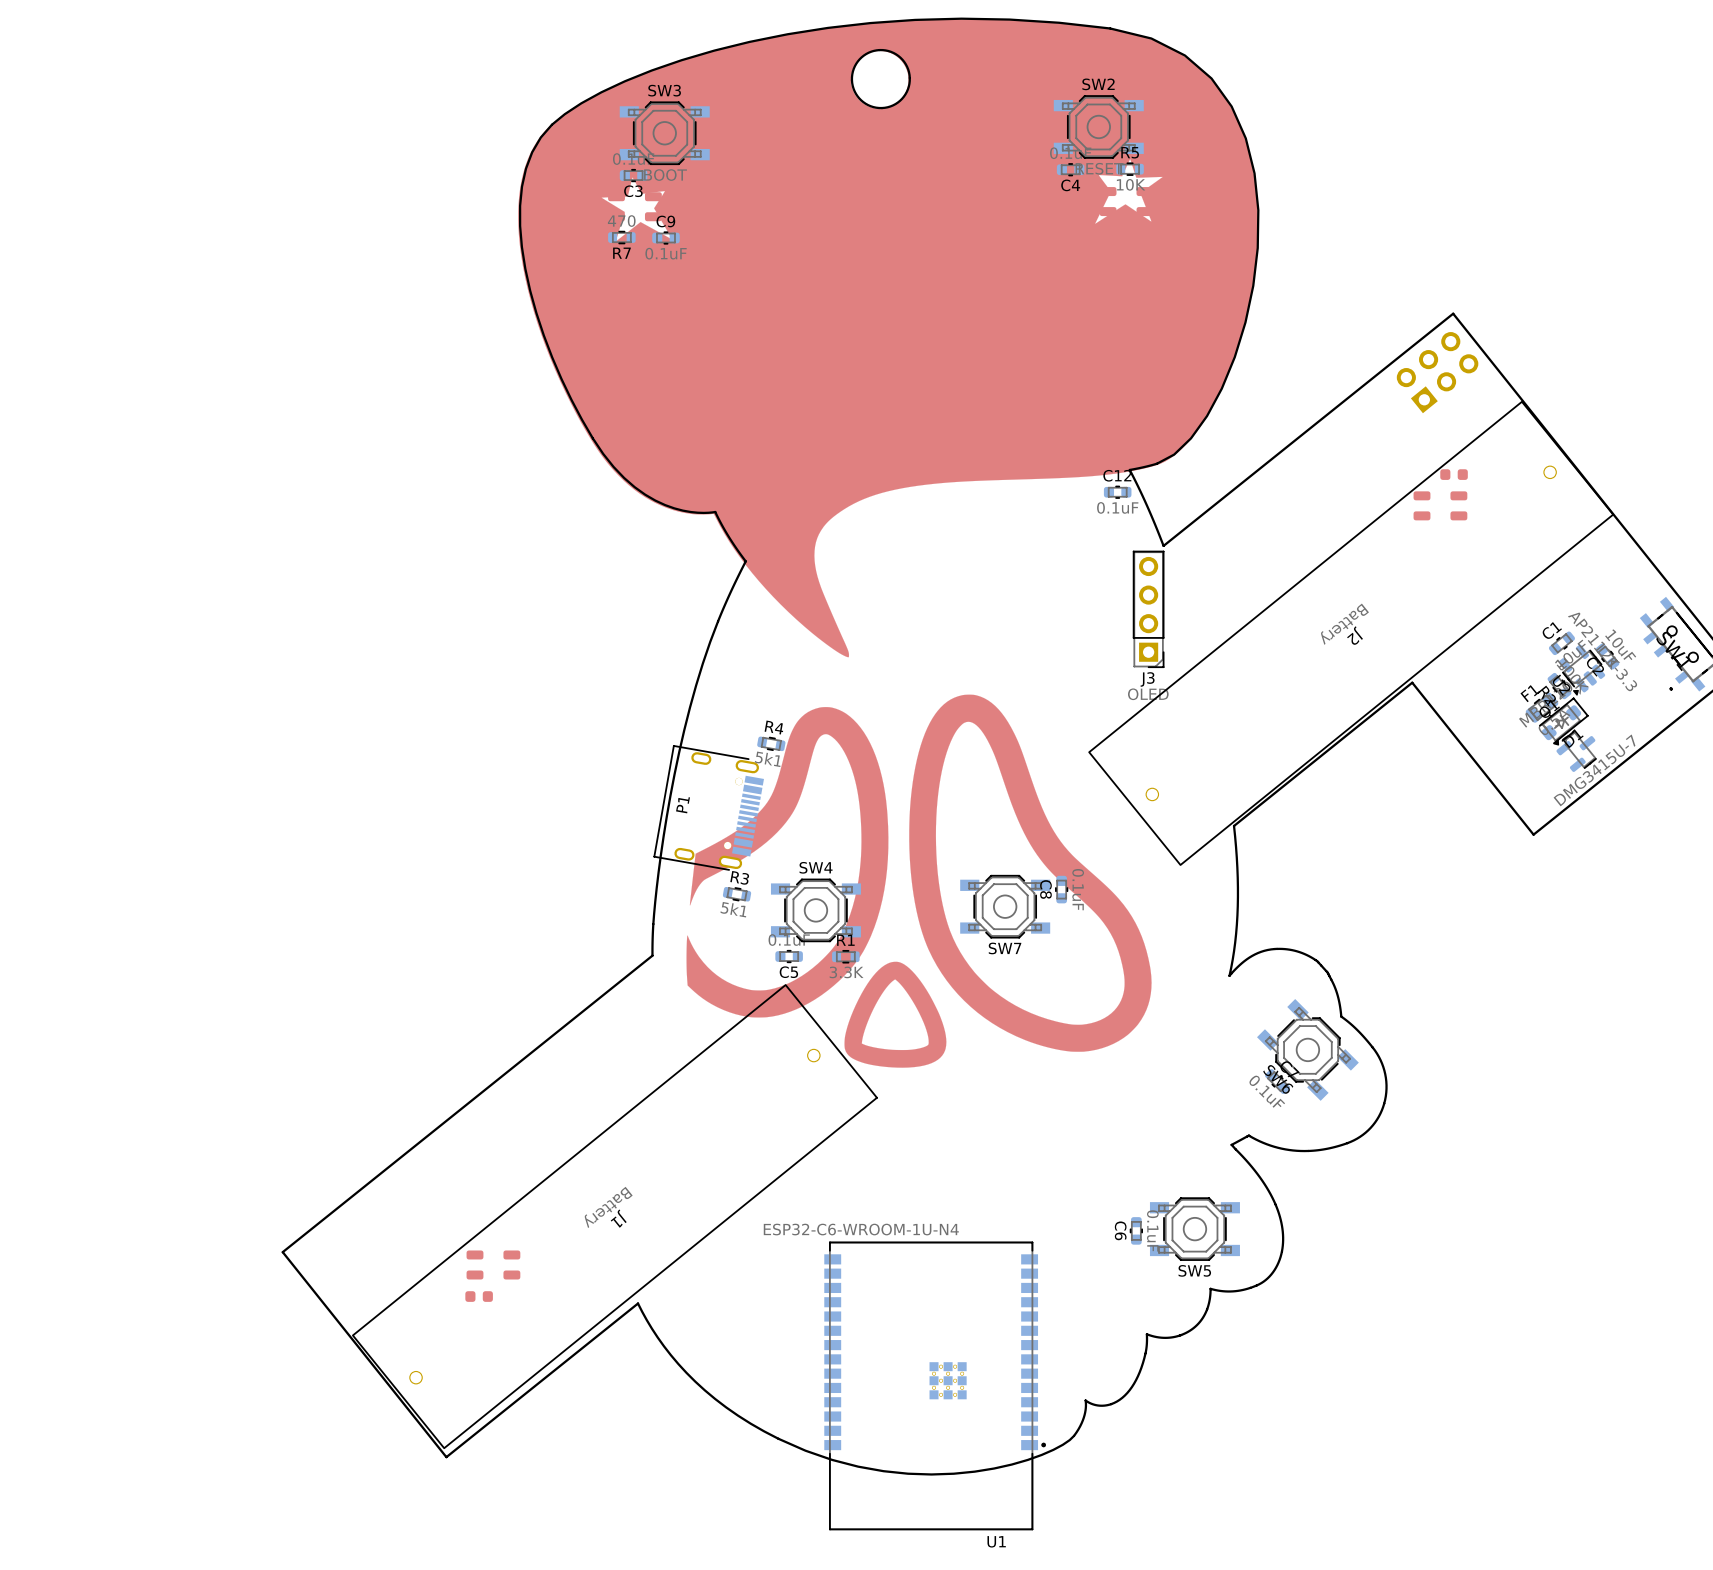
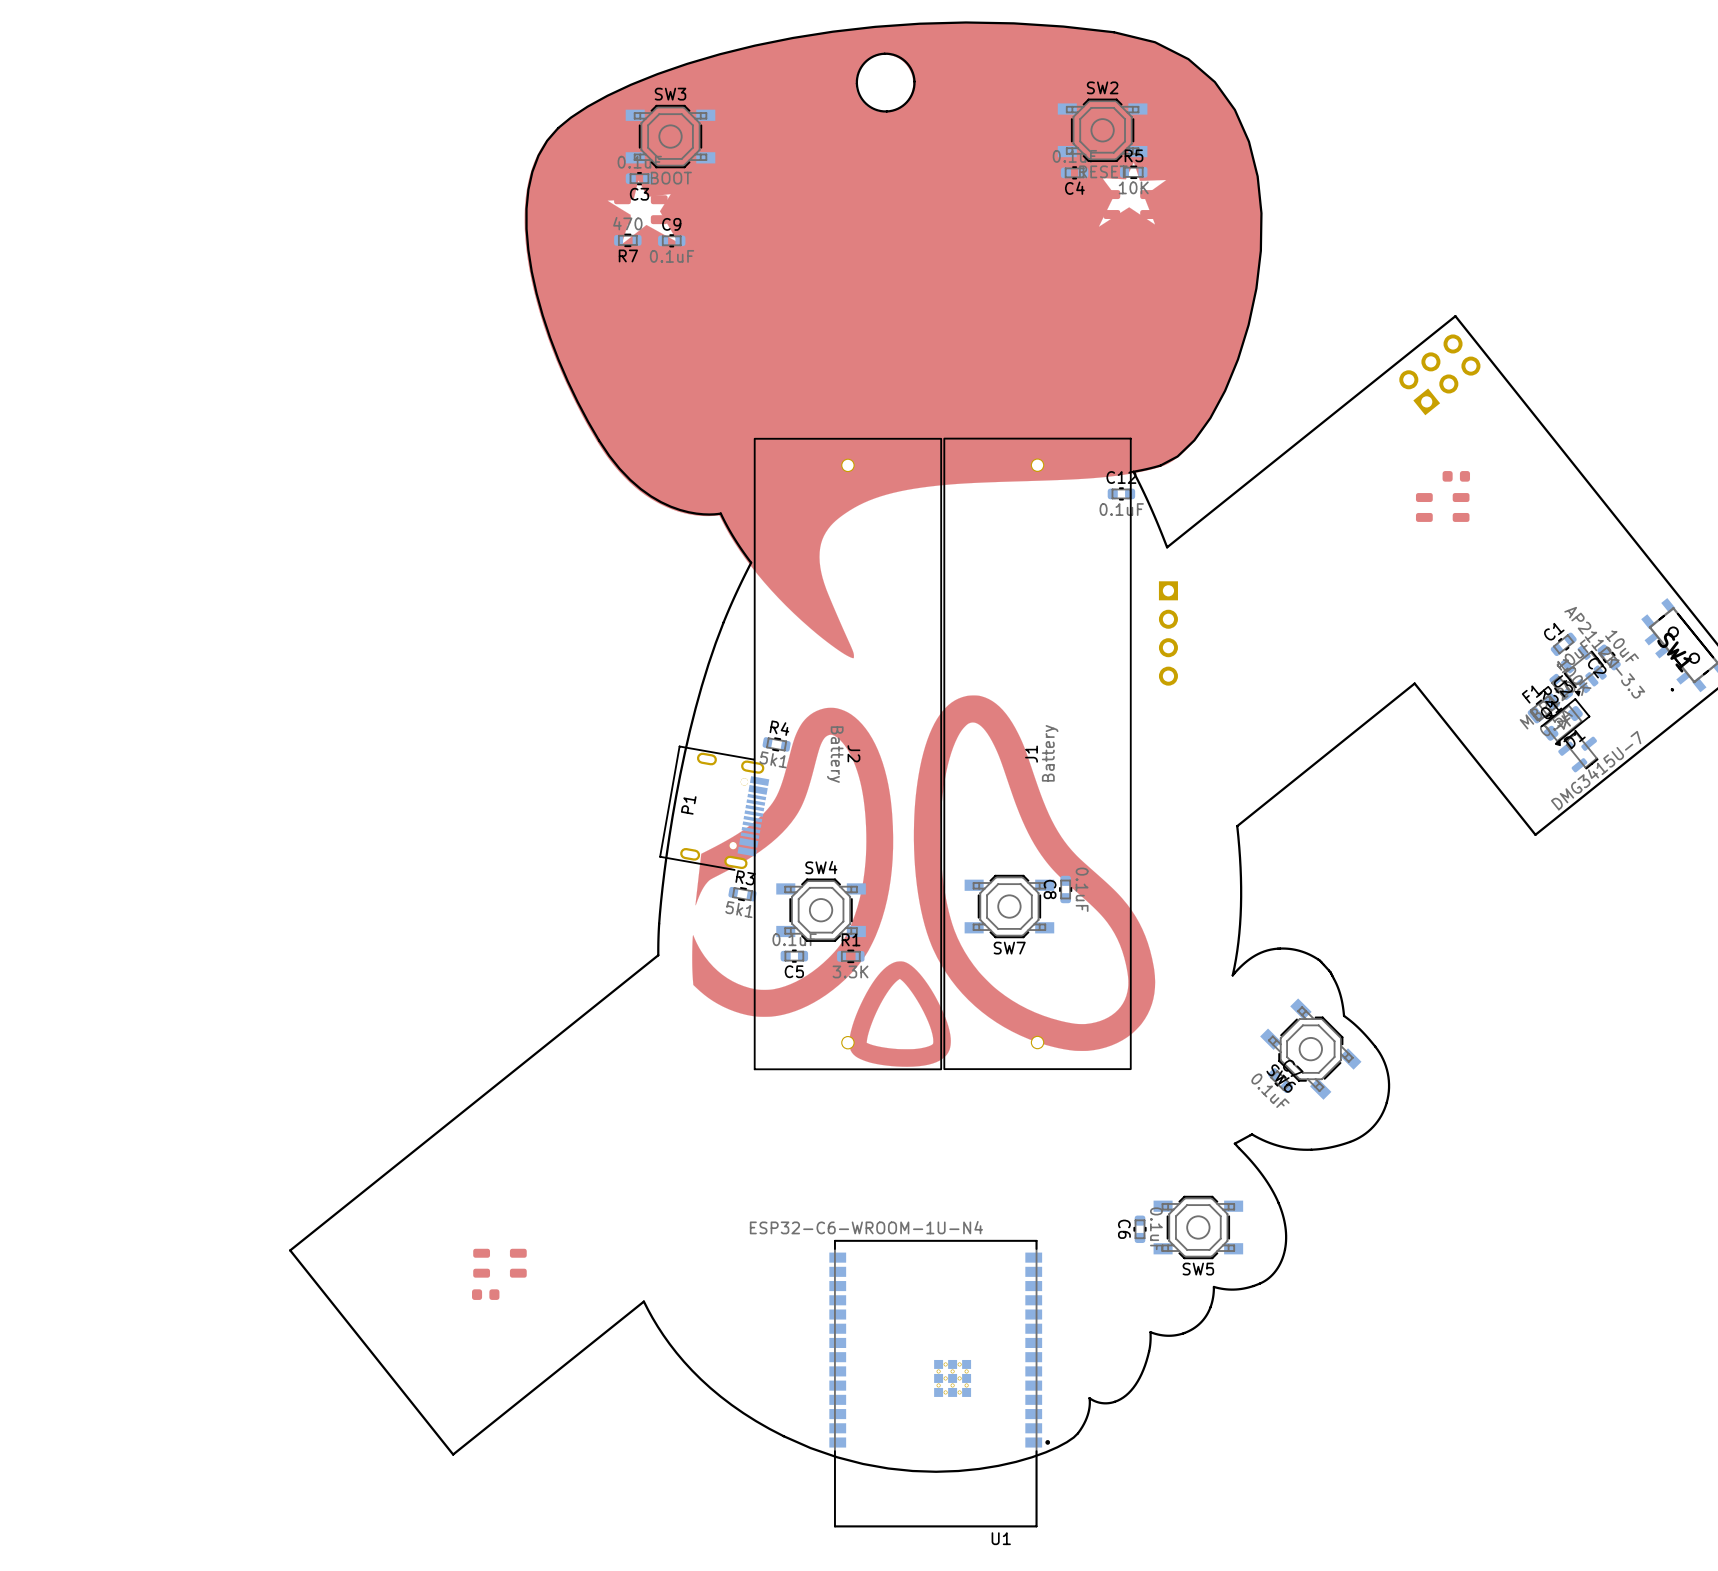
J2 footprint: [1088, 401, 1614, 866] -> [754, 438, 942, 1070]
J3 side: bottom (1148, 609) -> top (1168, 633)
J1 footprint: [352, 984, 878, 1449] -> [943, 438, 1132, 1070]

